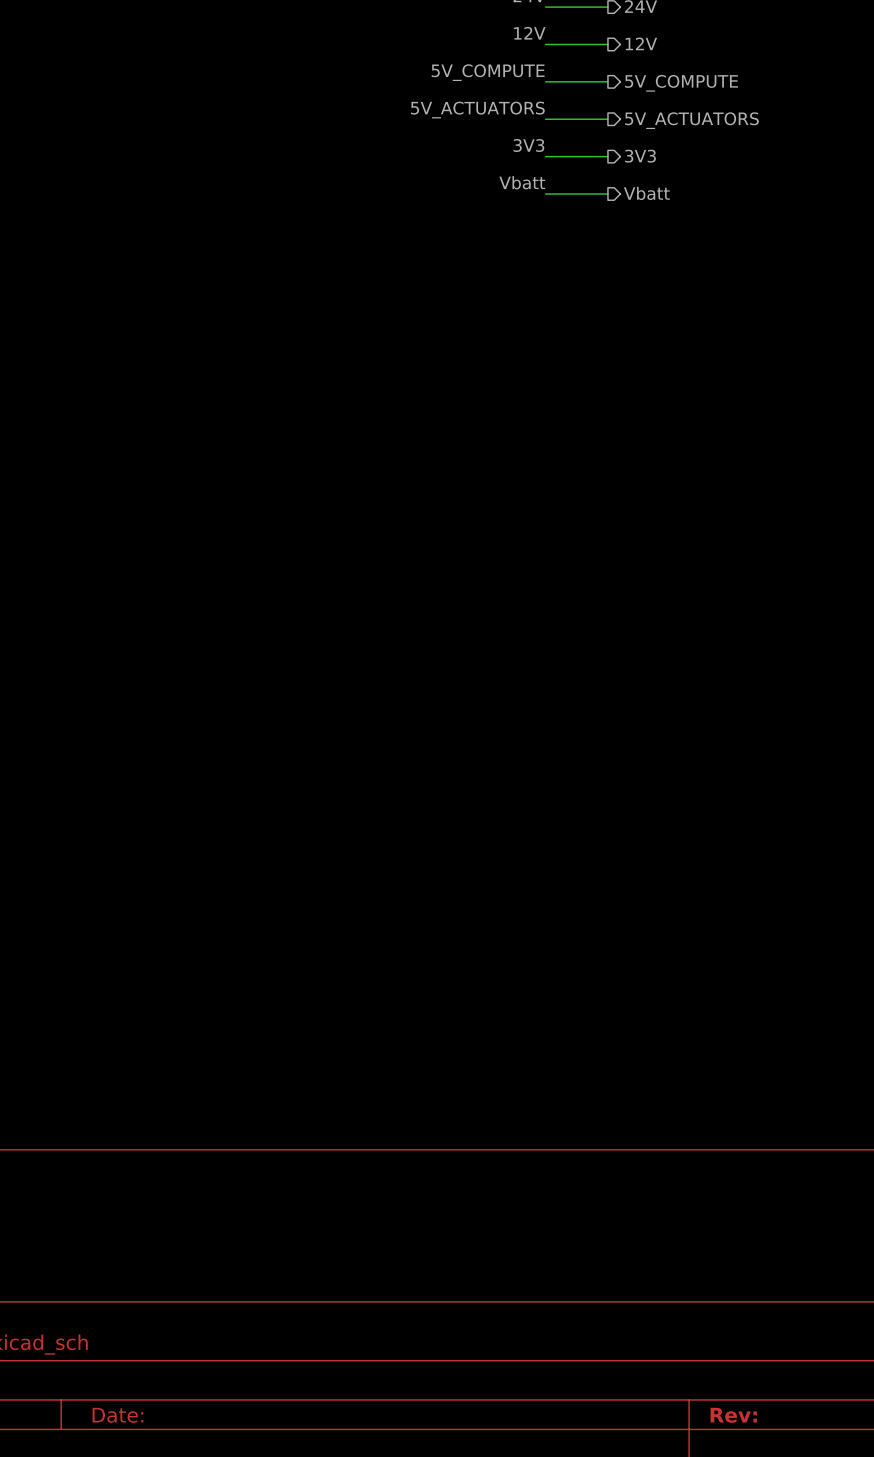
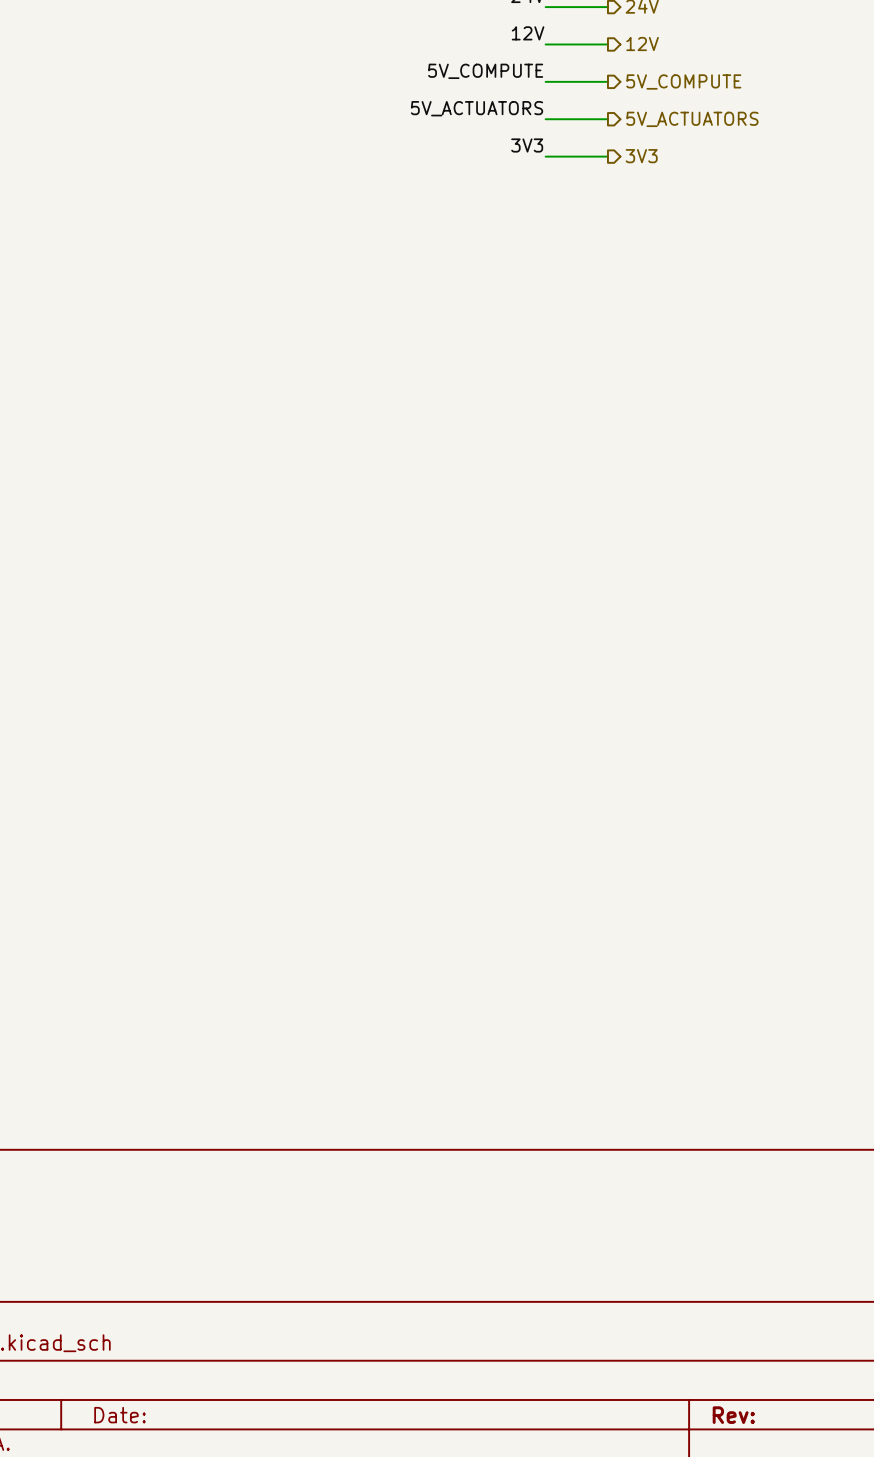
label: Vbatt (522, 182) -> none
hierarchical label: Vbatt (646, 193) -> none
wire: (545, 194) (607, 194) -> none

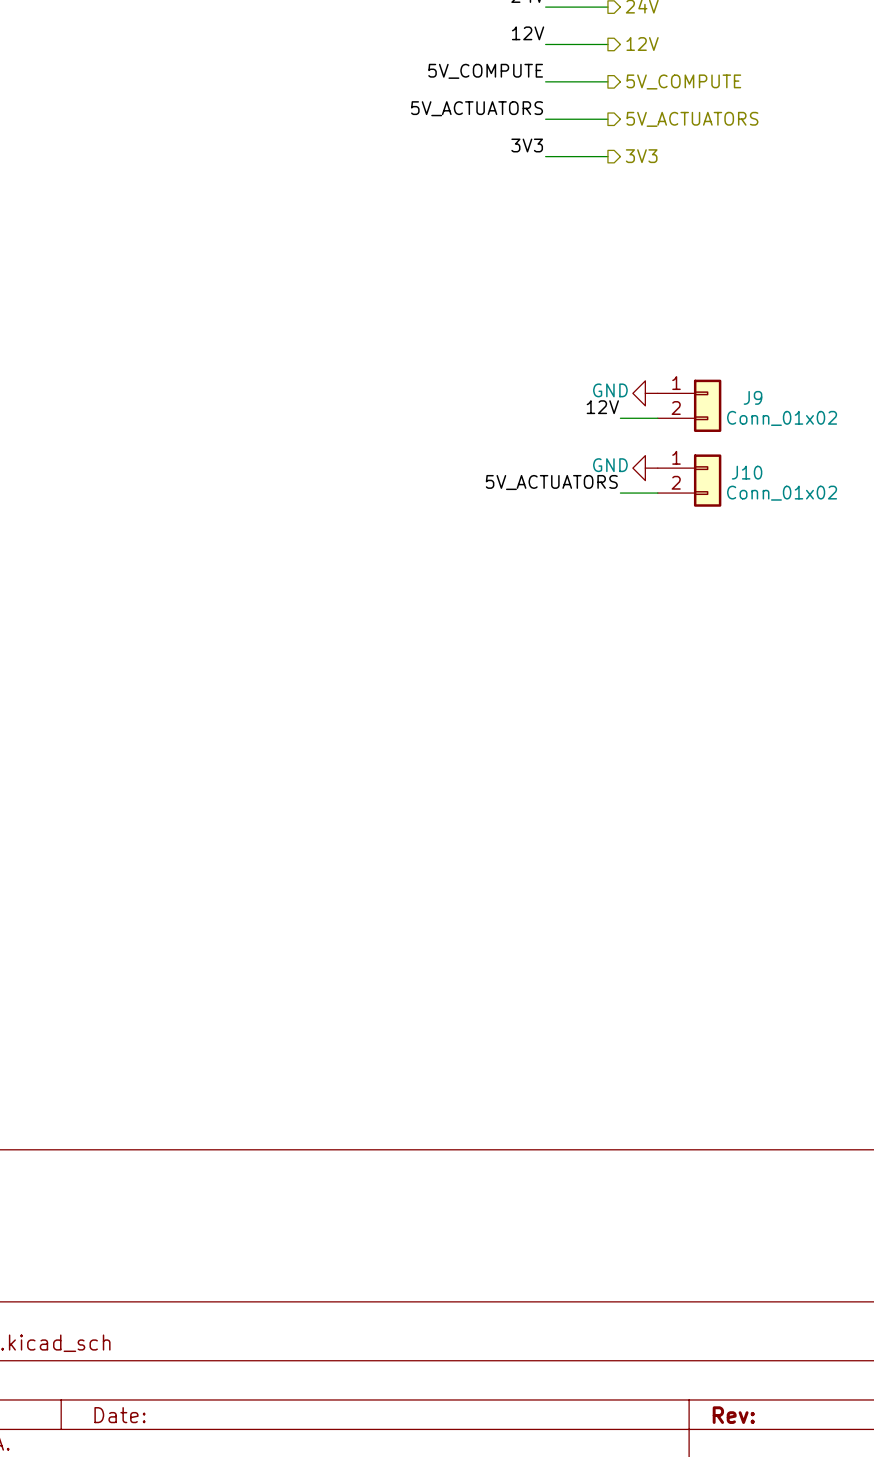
power symbol: none -> GND (645, 393)
J9: none -> Conn_01x02 (689, 405)
label: none -> 12V (602, 407)
wire: none -> (620, 418) (657, 418)
power symbol: none -> GND (645, 468)
J10: none -> Conn_01x02 (689, 480)
label: none -> 5V_ACTUATORS (551, 482)
wire: none -> (620, 493) (657, 493)

